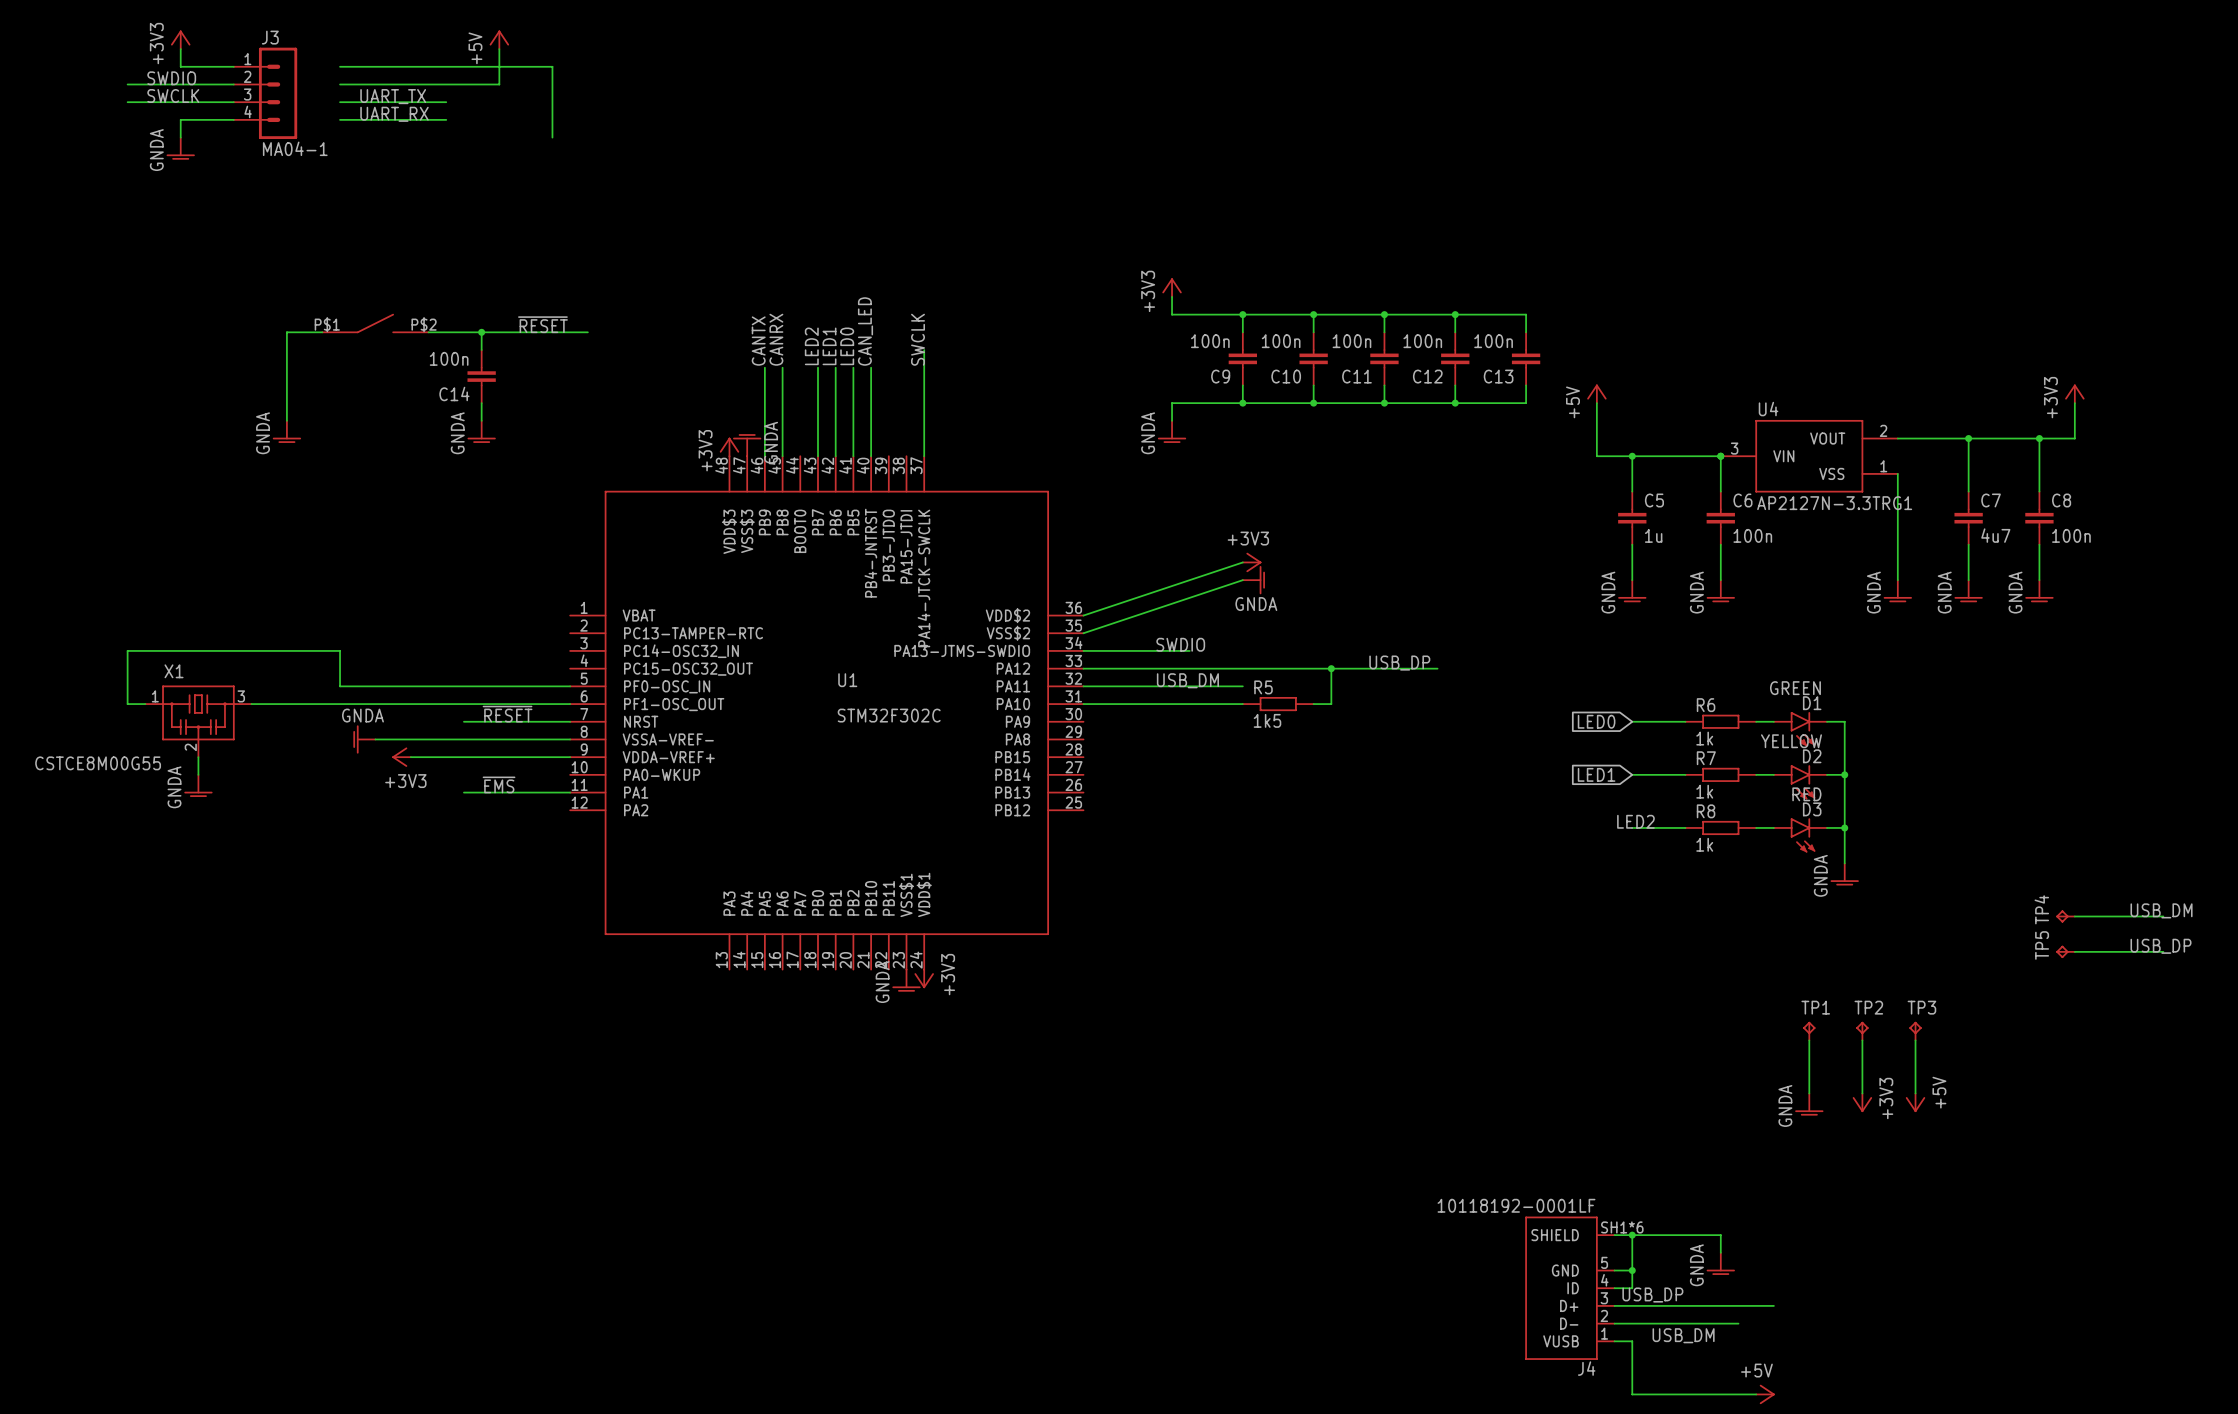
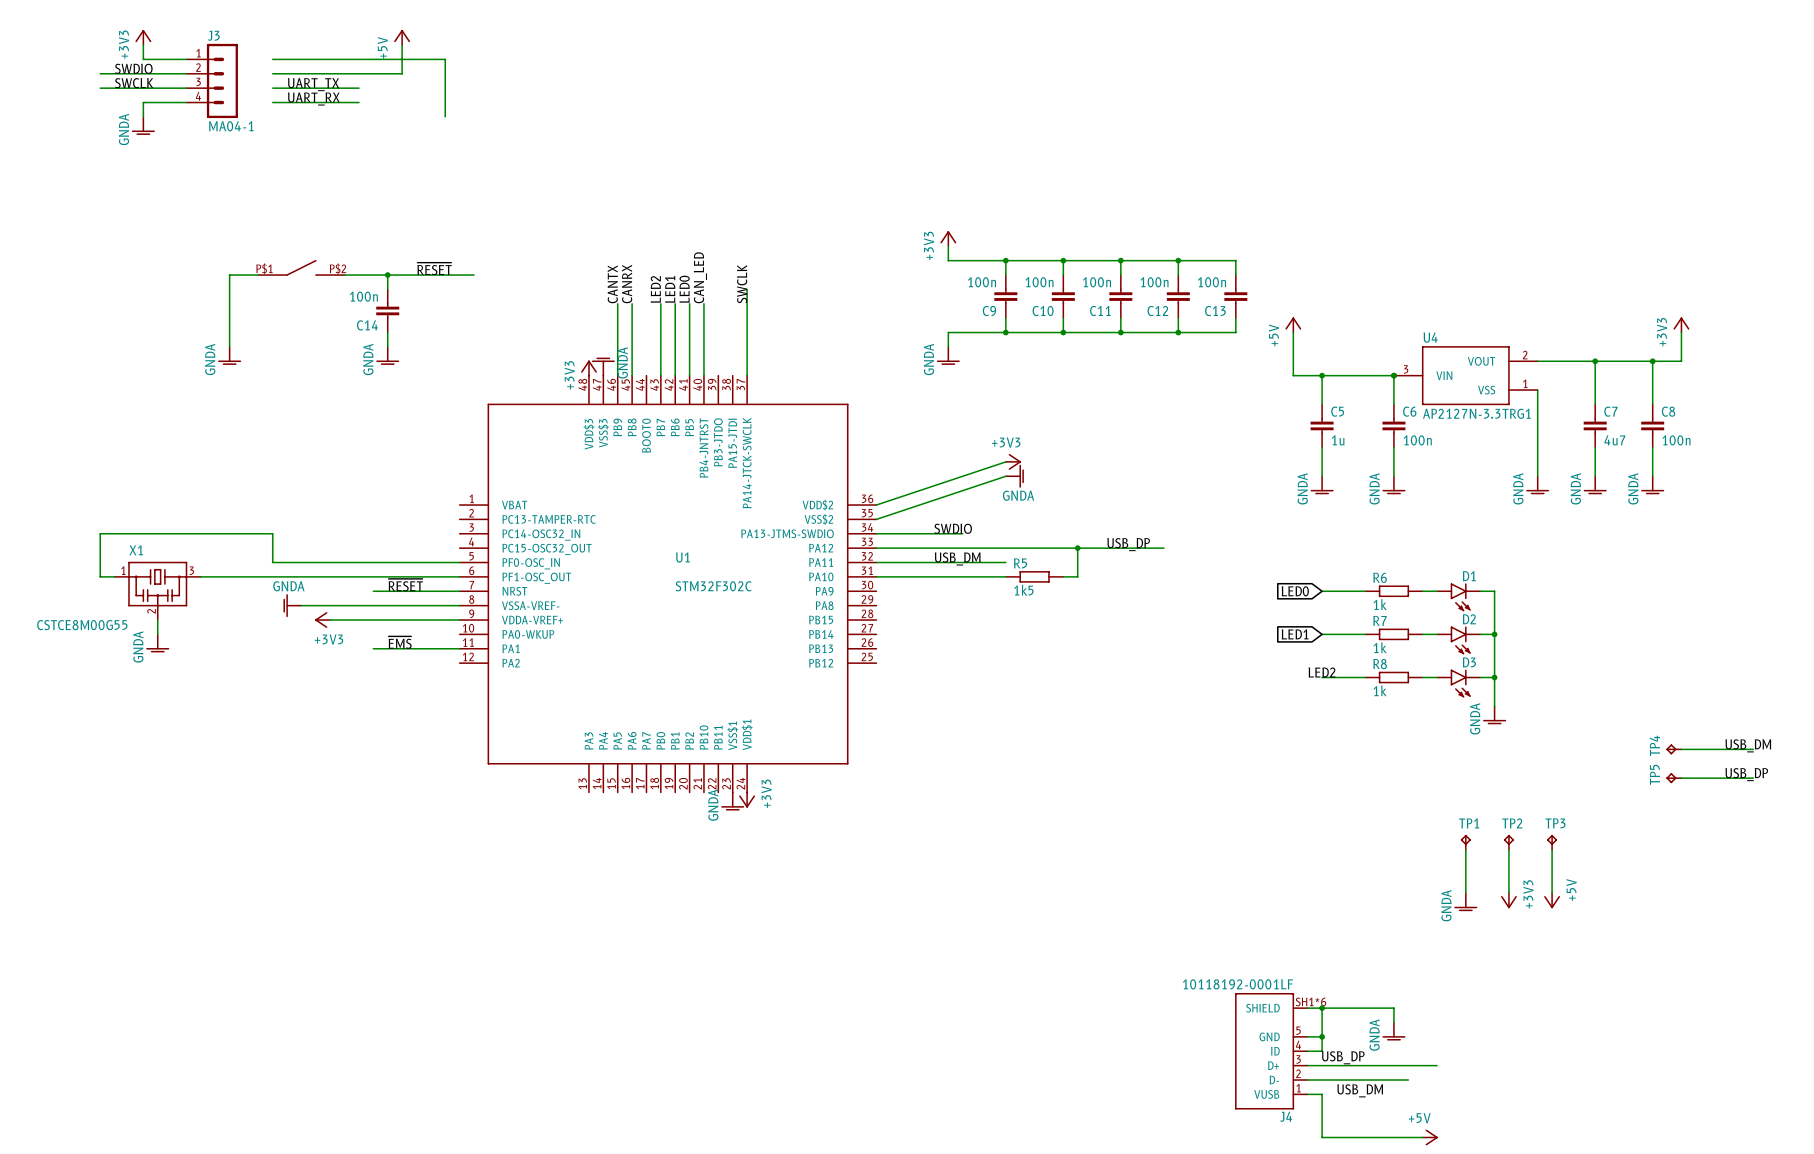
D1 value: GREEN (1795, 688) -> none
D2 value: YELLOW (1791, 741) -> none
D3 value: RED (1806, 794) -> none

